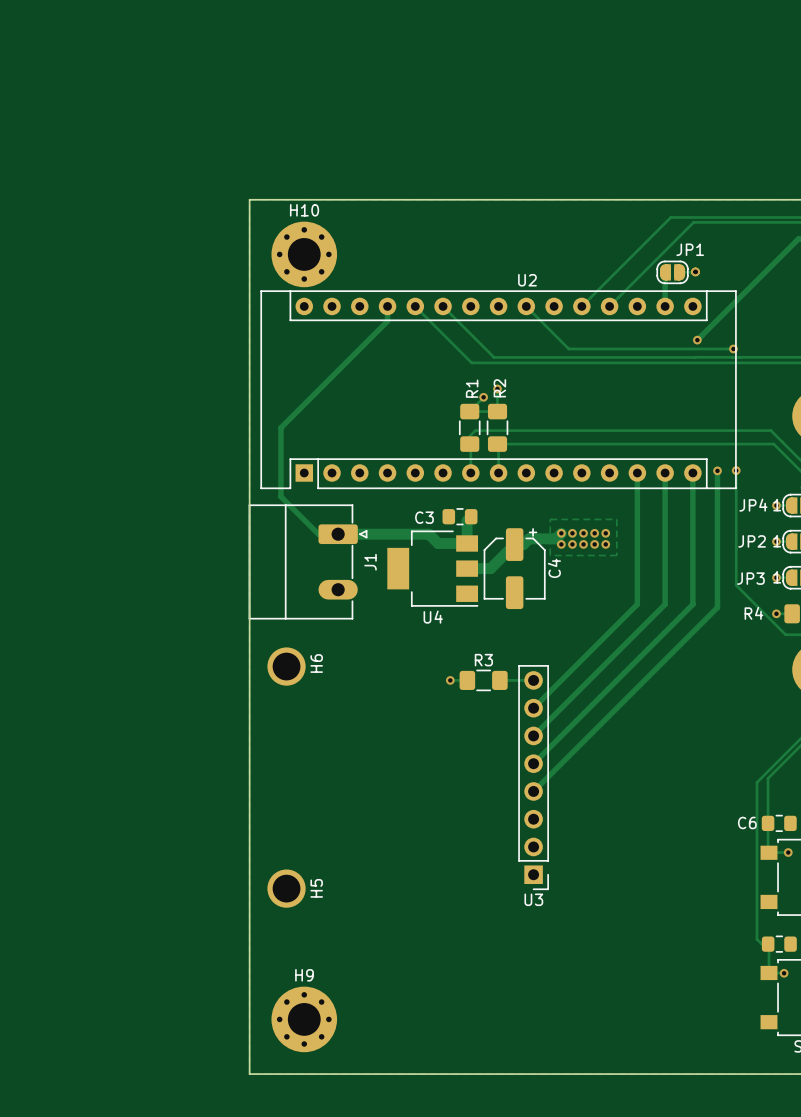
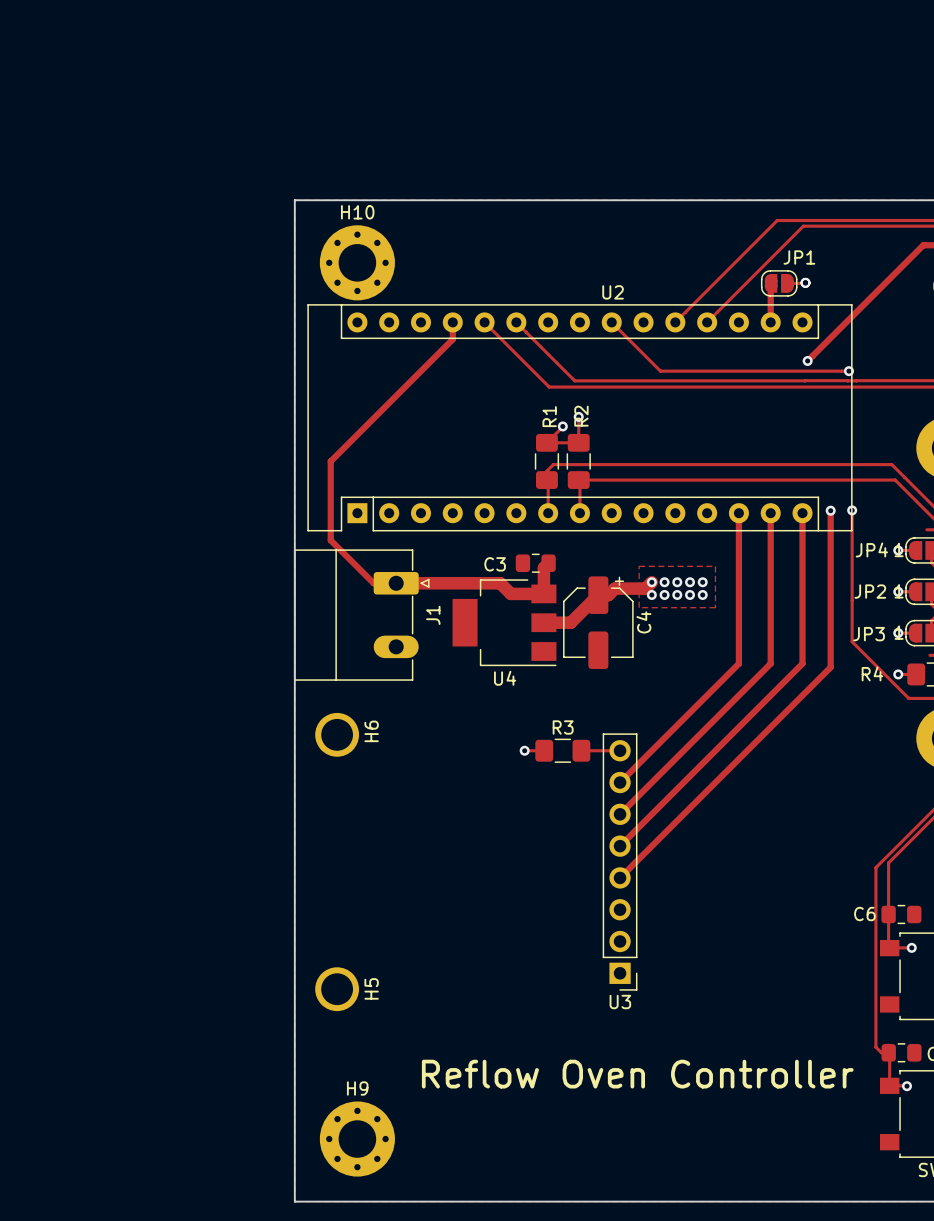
text: none -> Reflow Oven Controller (637, 1074)

